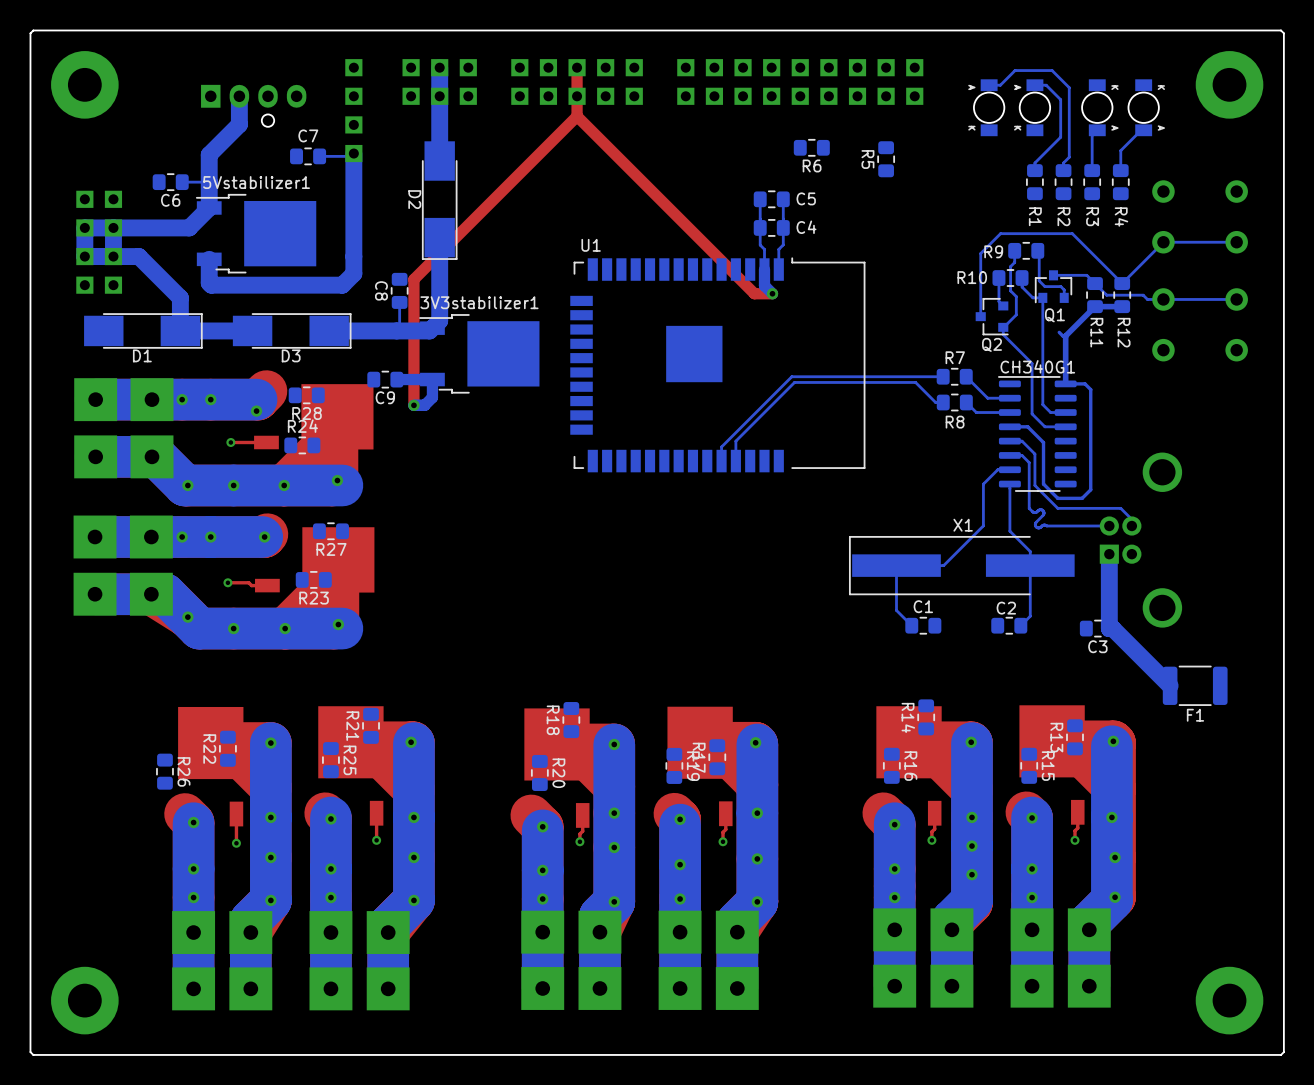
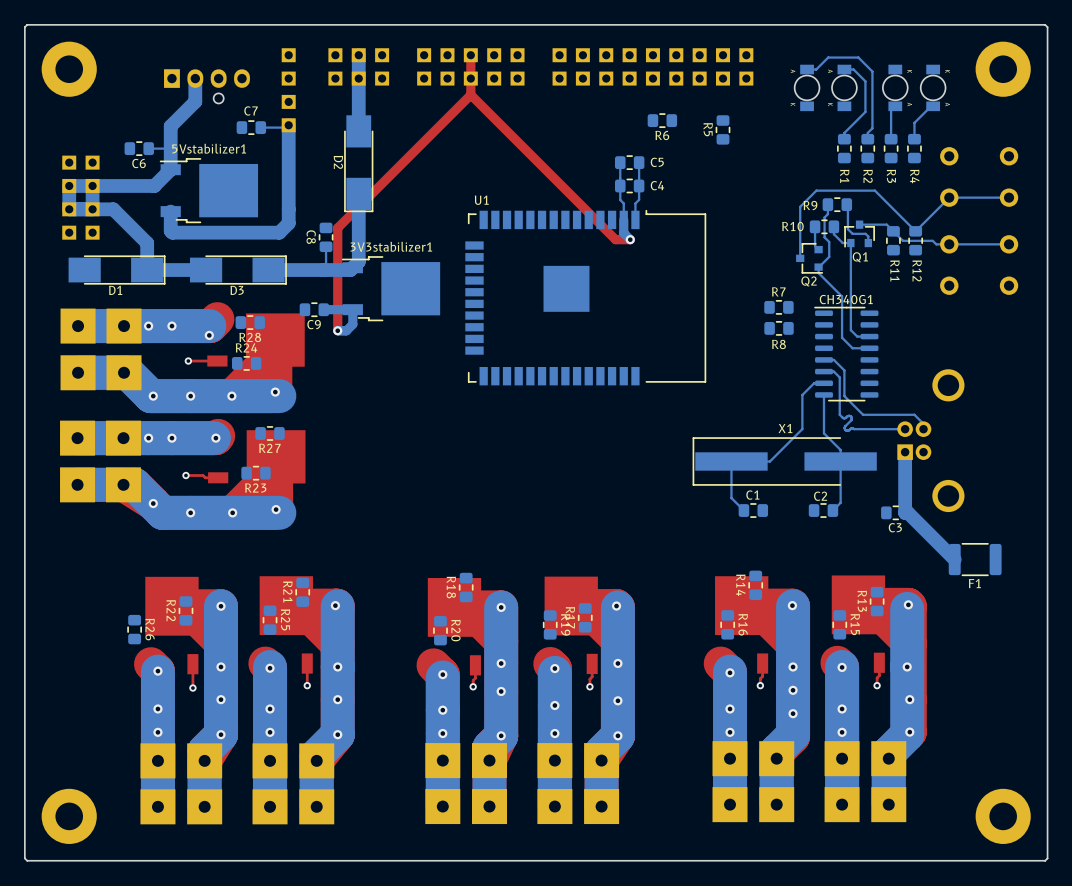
bottom track: (1122, 306) (1095, 306) (1065, 335) -> none
bottom track: (1059, 332) (1065, 335) -> none
bottom track: (1065, 335) (1065, 383) (1085, 383) (1090, 389) (1090, 489) (1082, 498) (1057, 498) (1043, 484) (1043, 442) (1027, 426) (1009, 426) -> none
bottom track: (943, 376) (791, 376) (721, 446) (721, 461) -> none
bottom track: (966, 376) (987, 398) (1009, 398) -> none
bottom track: (943, 402) (935, 402) (915, 382) (794, 382) (735, 441) (735, 461) -> none
bottom track: (966, 402) (976, 412) (1009, 412) -> none

